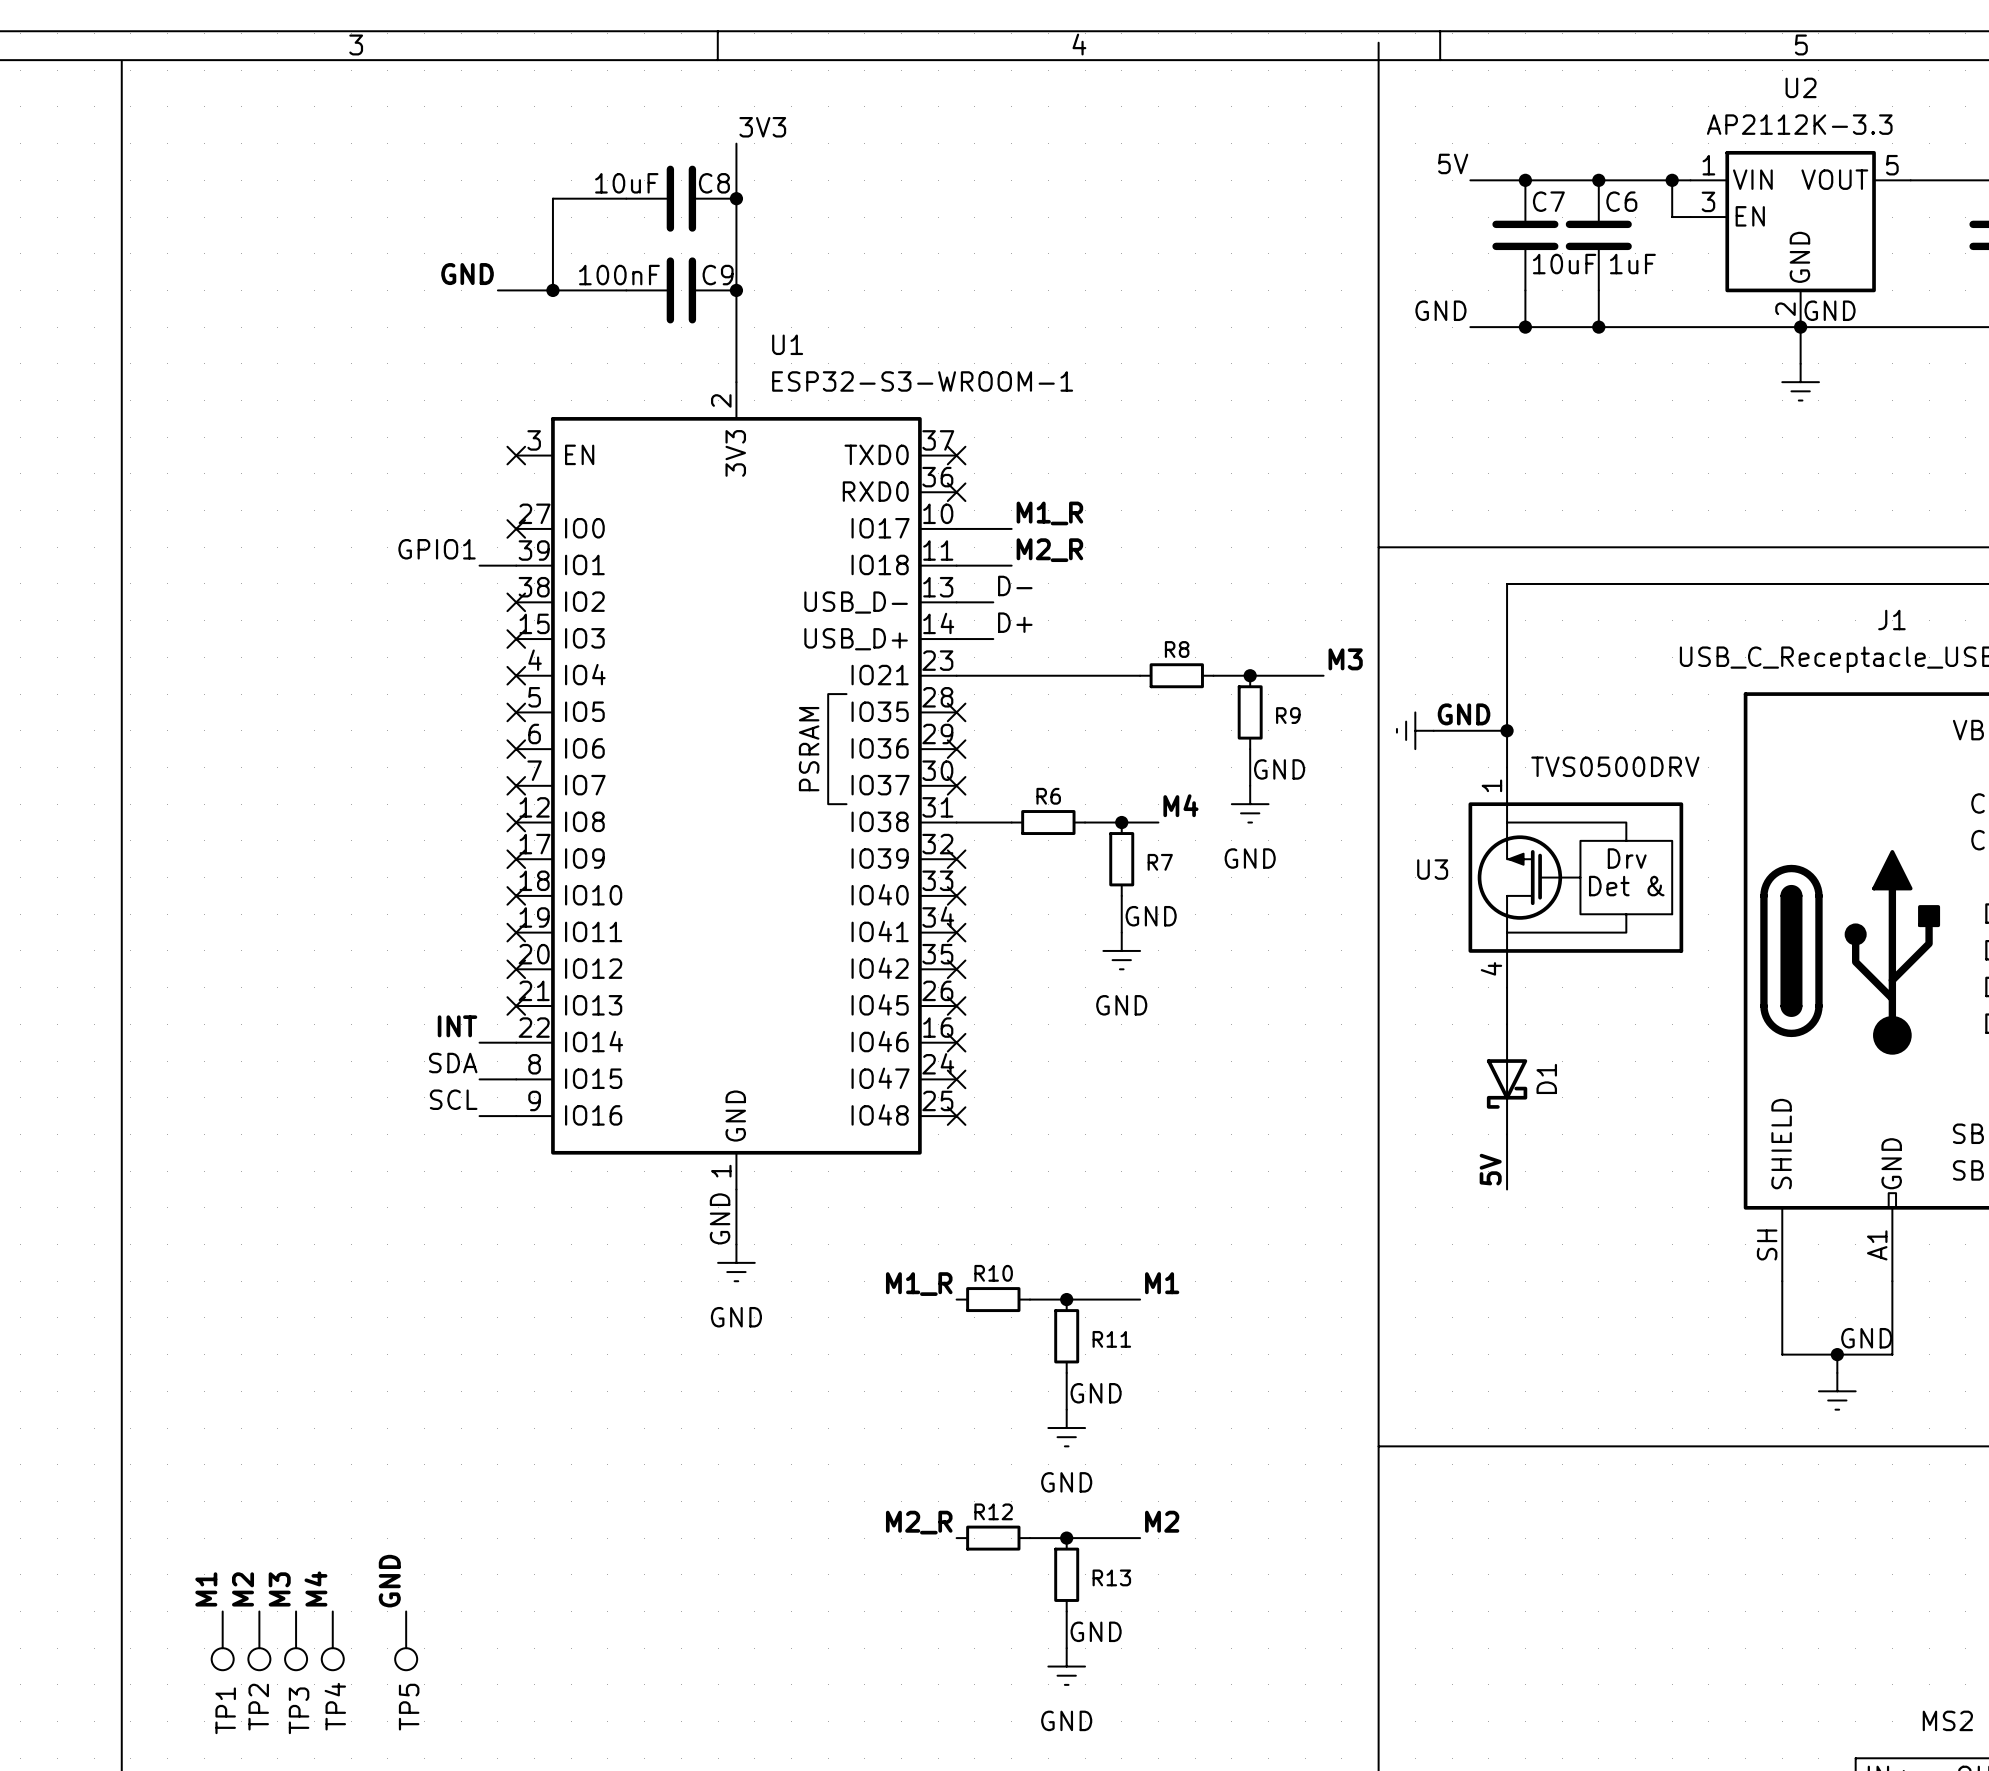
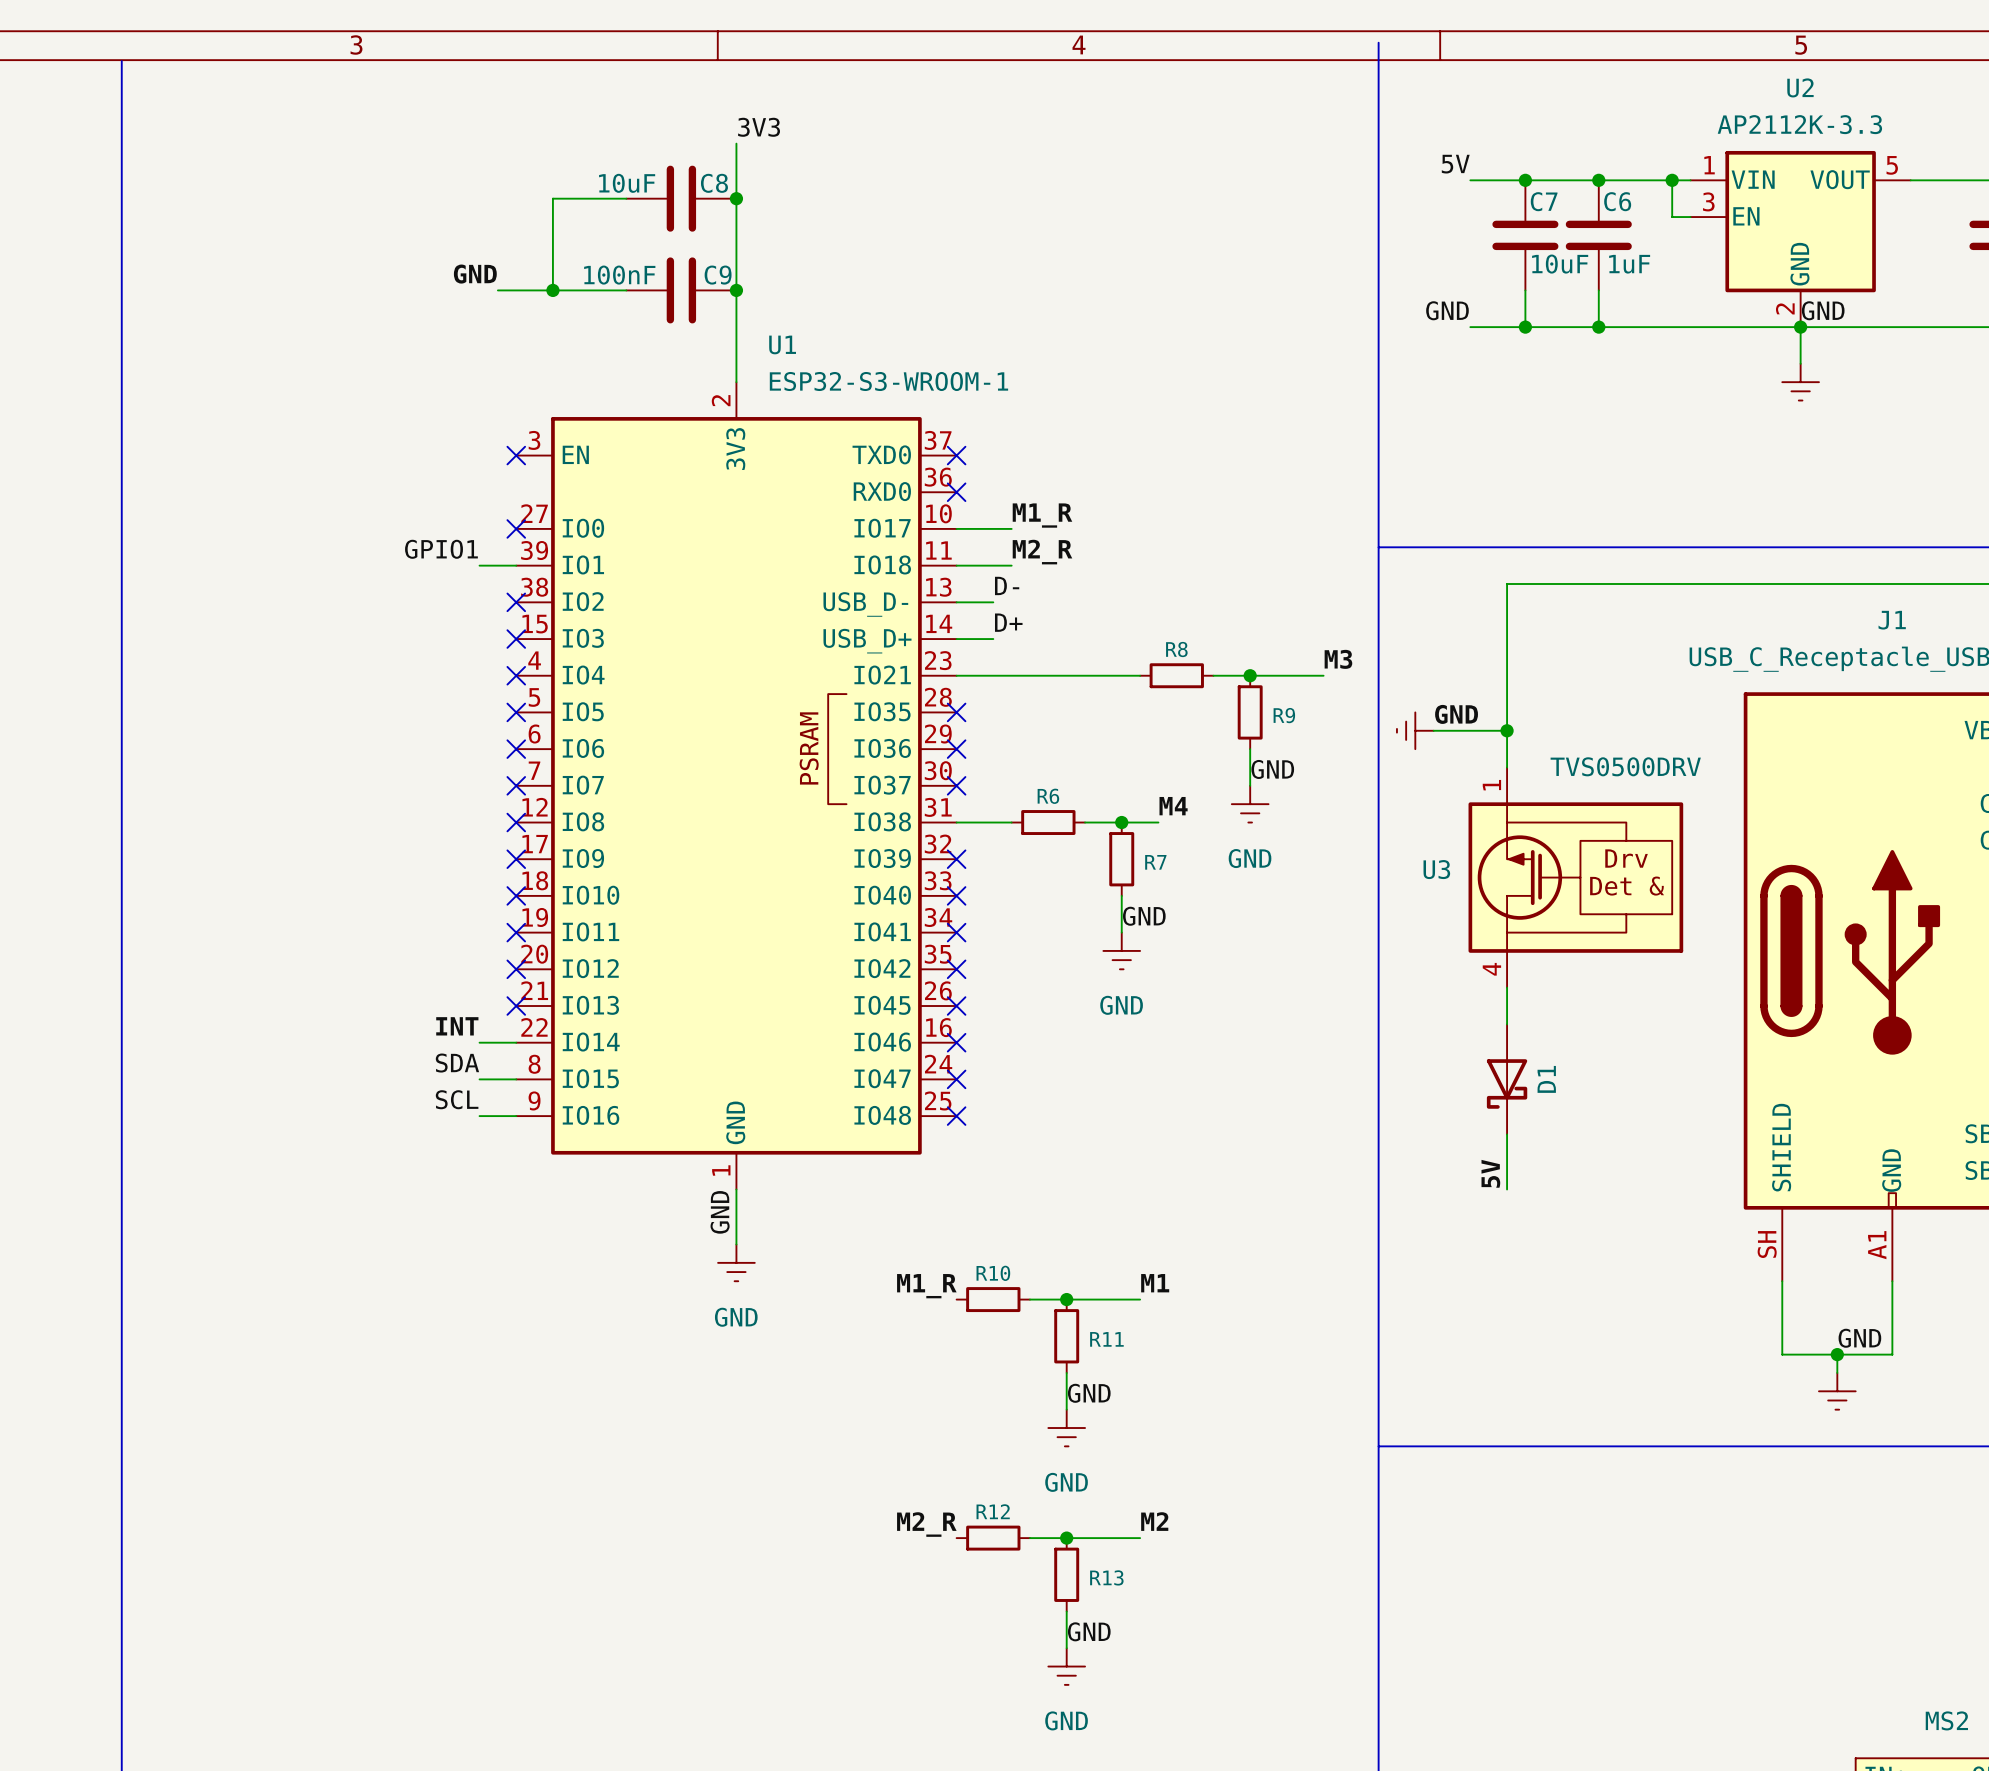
label: GND (389, 1581) -> none
label: M4 (315, 1588) -> none
label: M1 (206, 1589) -> none
label: M2 (243, 1589) -> none
label: M3 (279, 1589) -> none
TP1: (222, 1640) -> none
TP2: (259, 1640) -> none
TP3: (296, 1640) -> none
TP4: (332, 1640) -> none
TP5: (406, 1640) -> none

